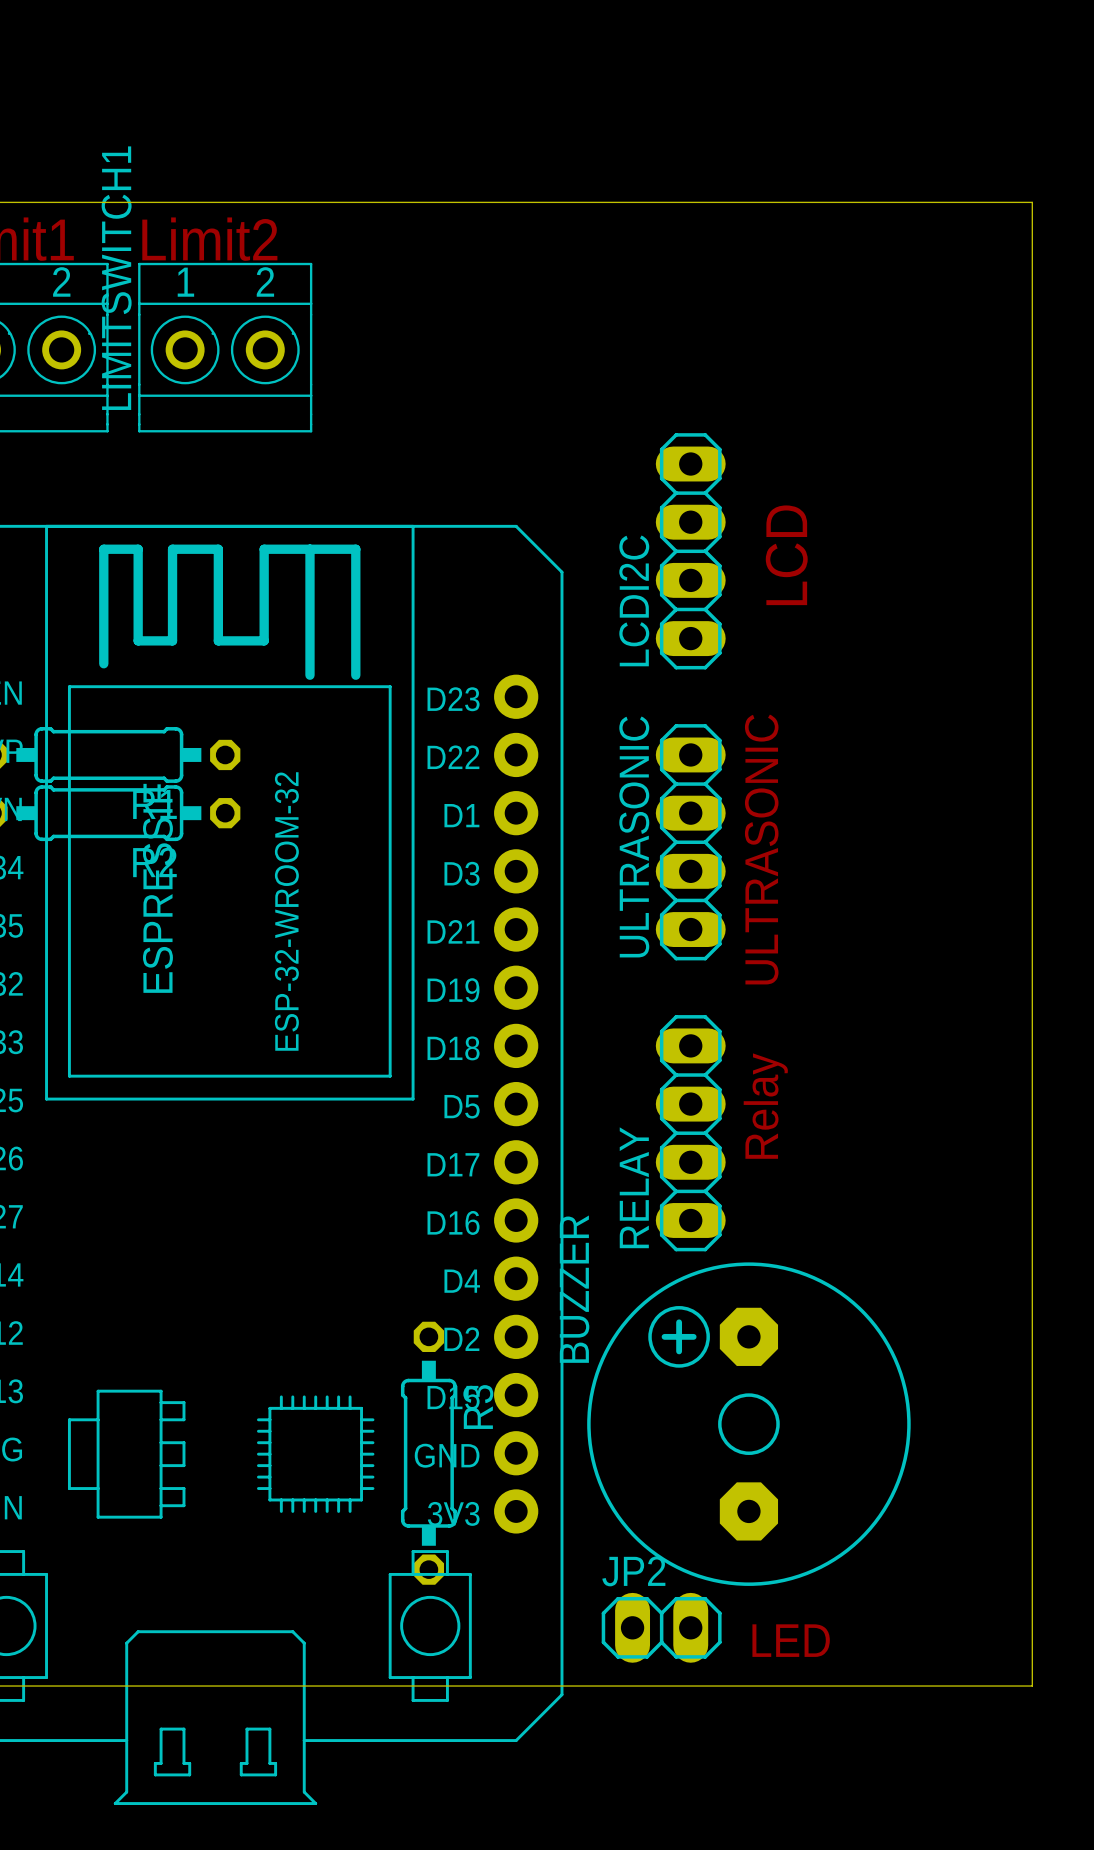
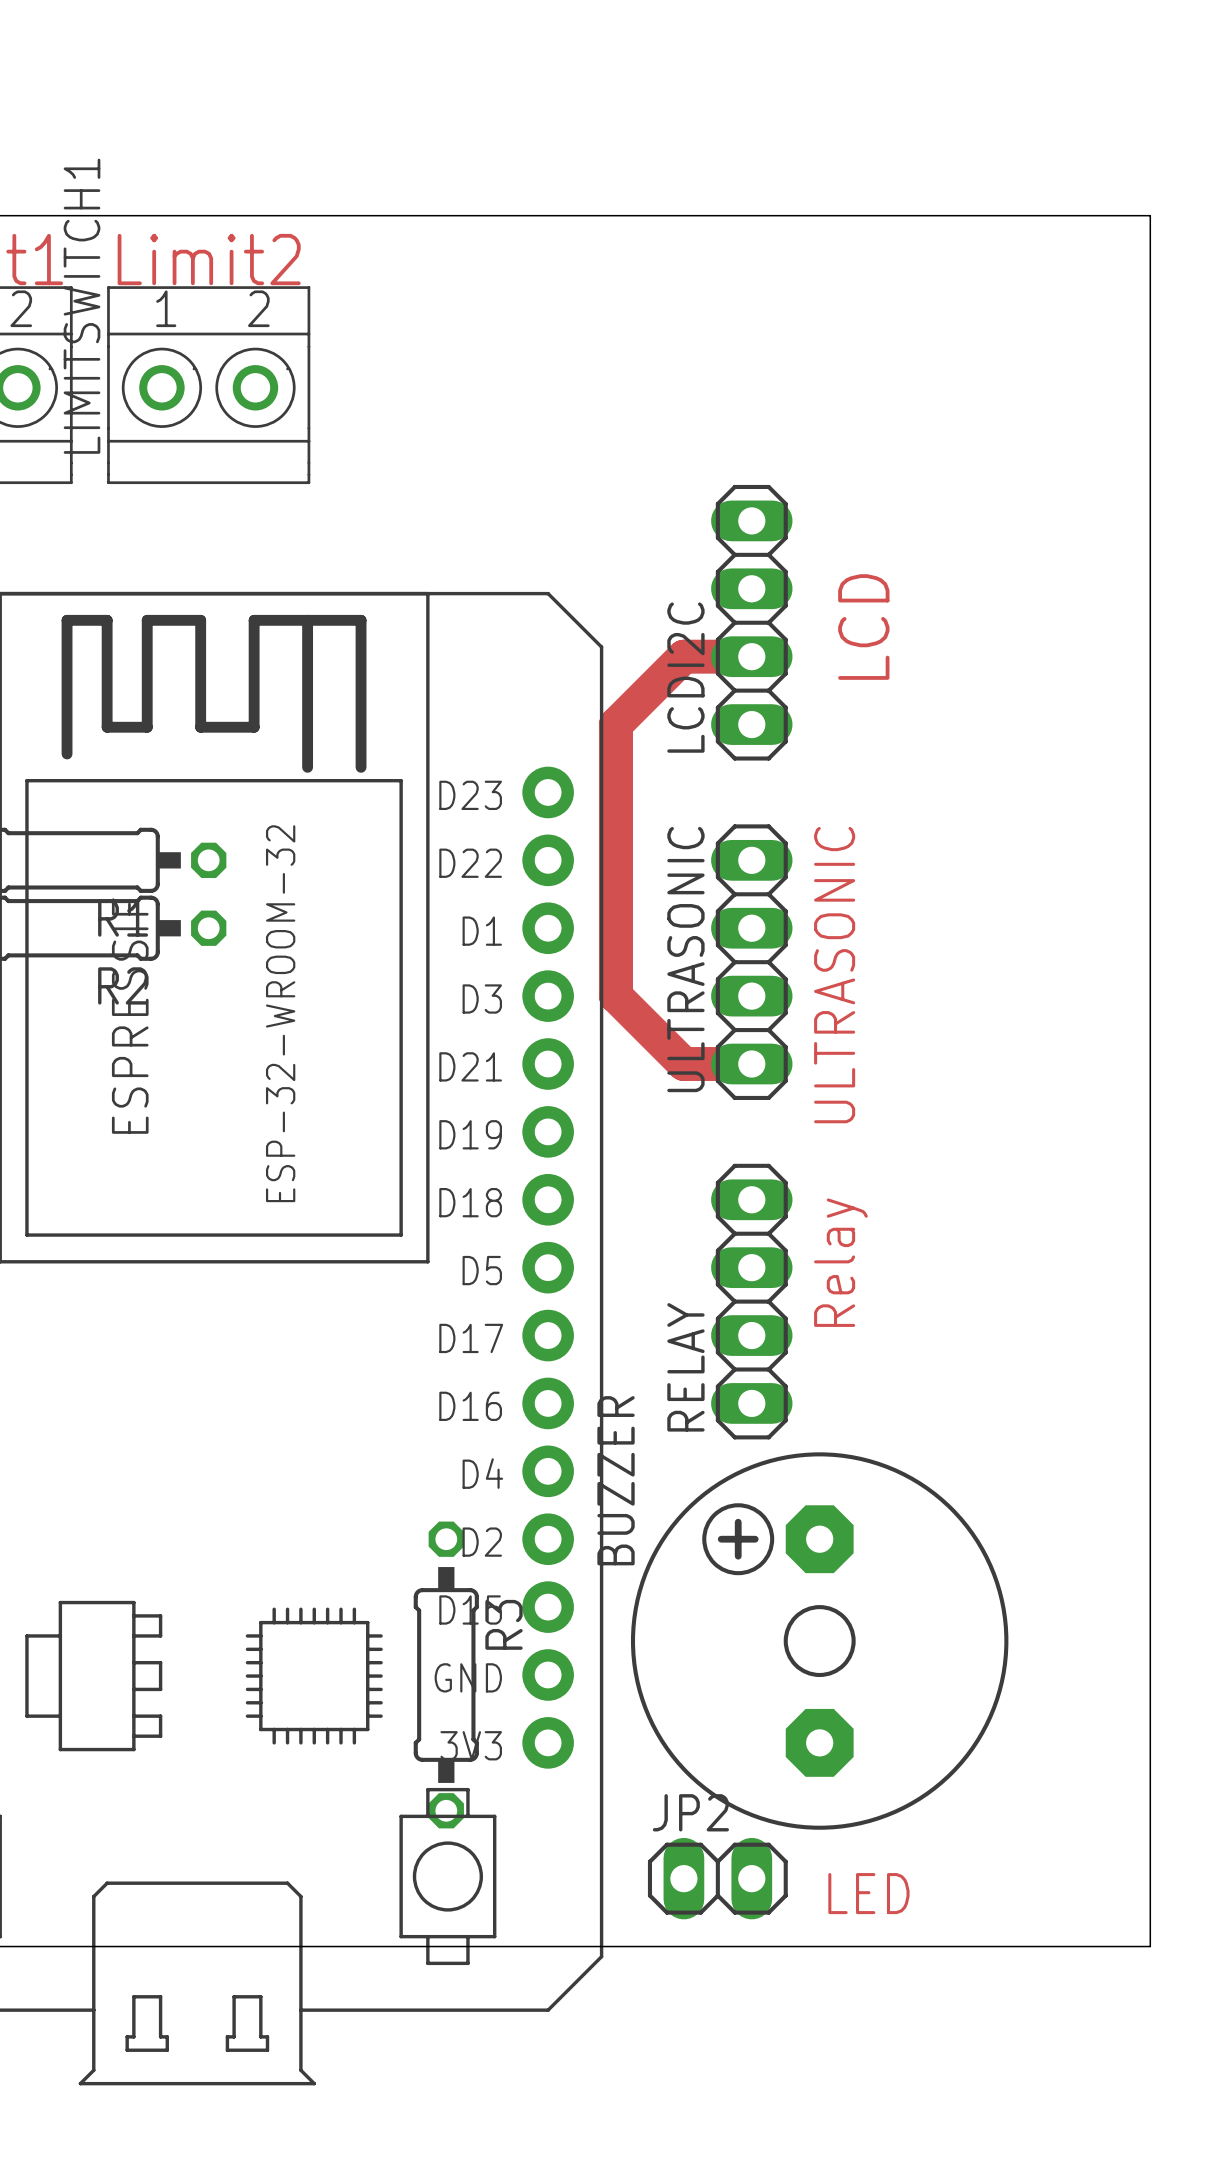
track: none -> (751, 656) (683, 656) (616, 724) (616, 996) (683, 1064) (751, 1064)

